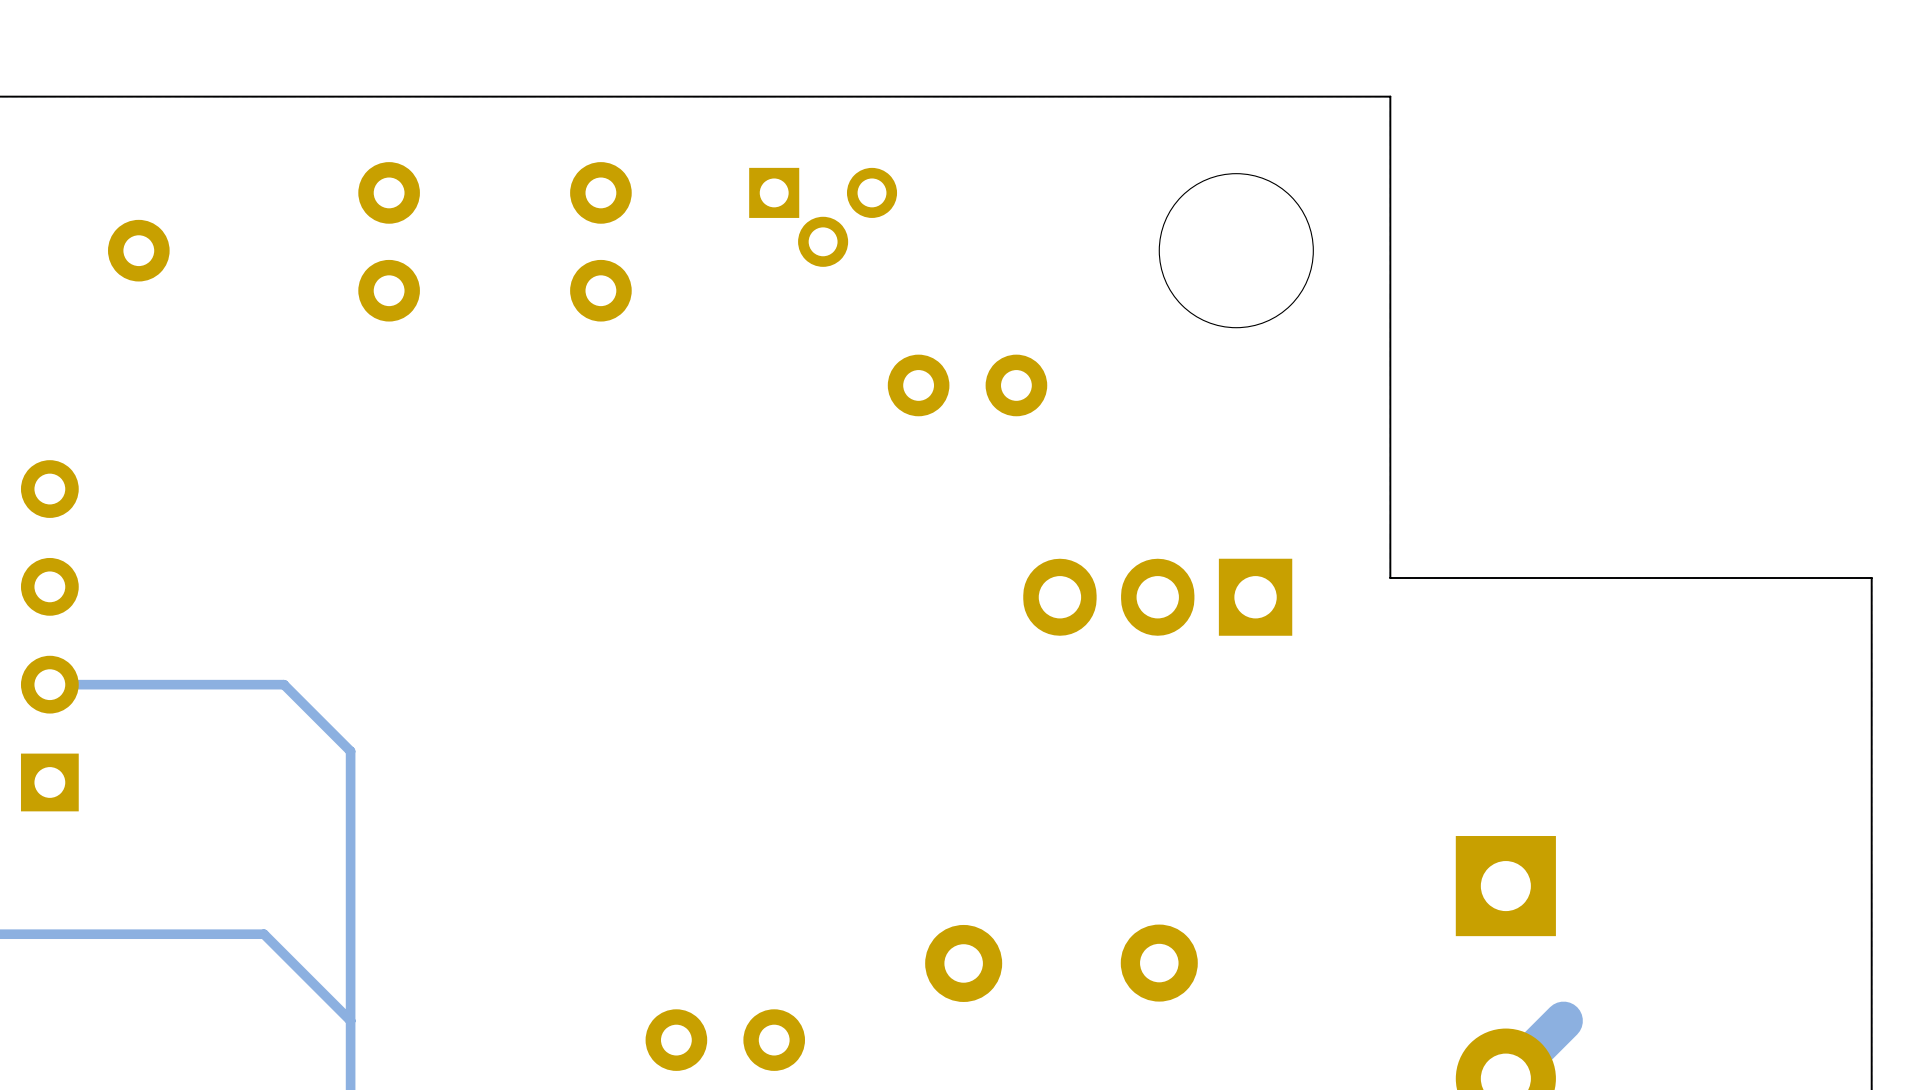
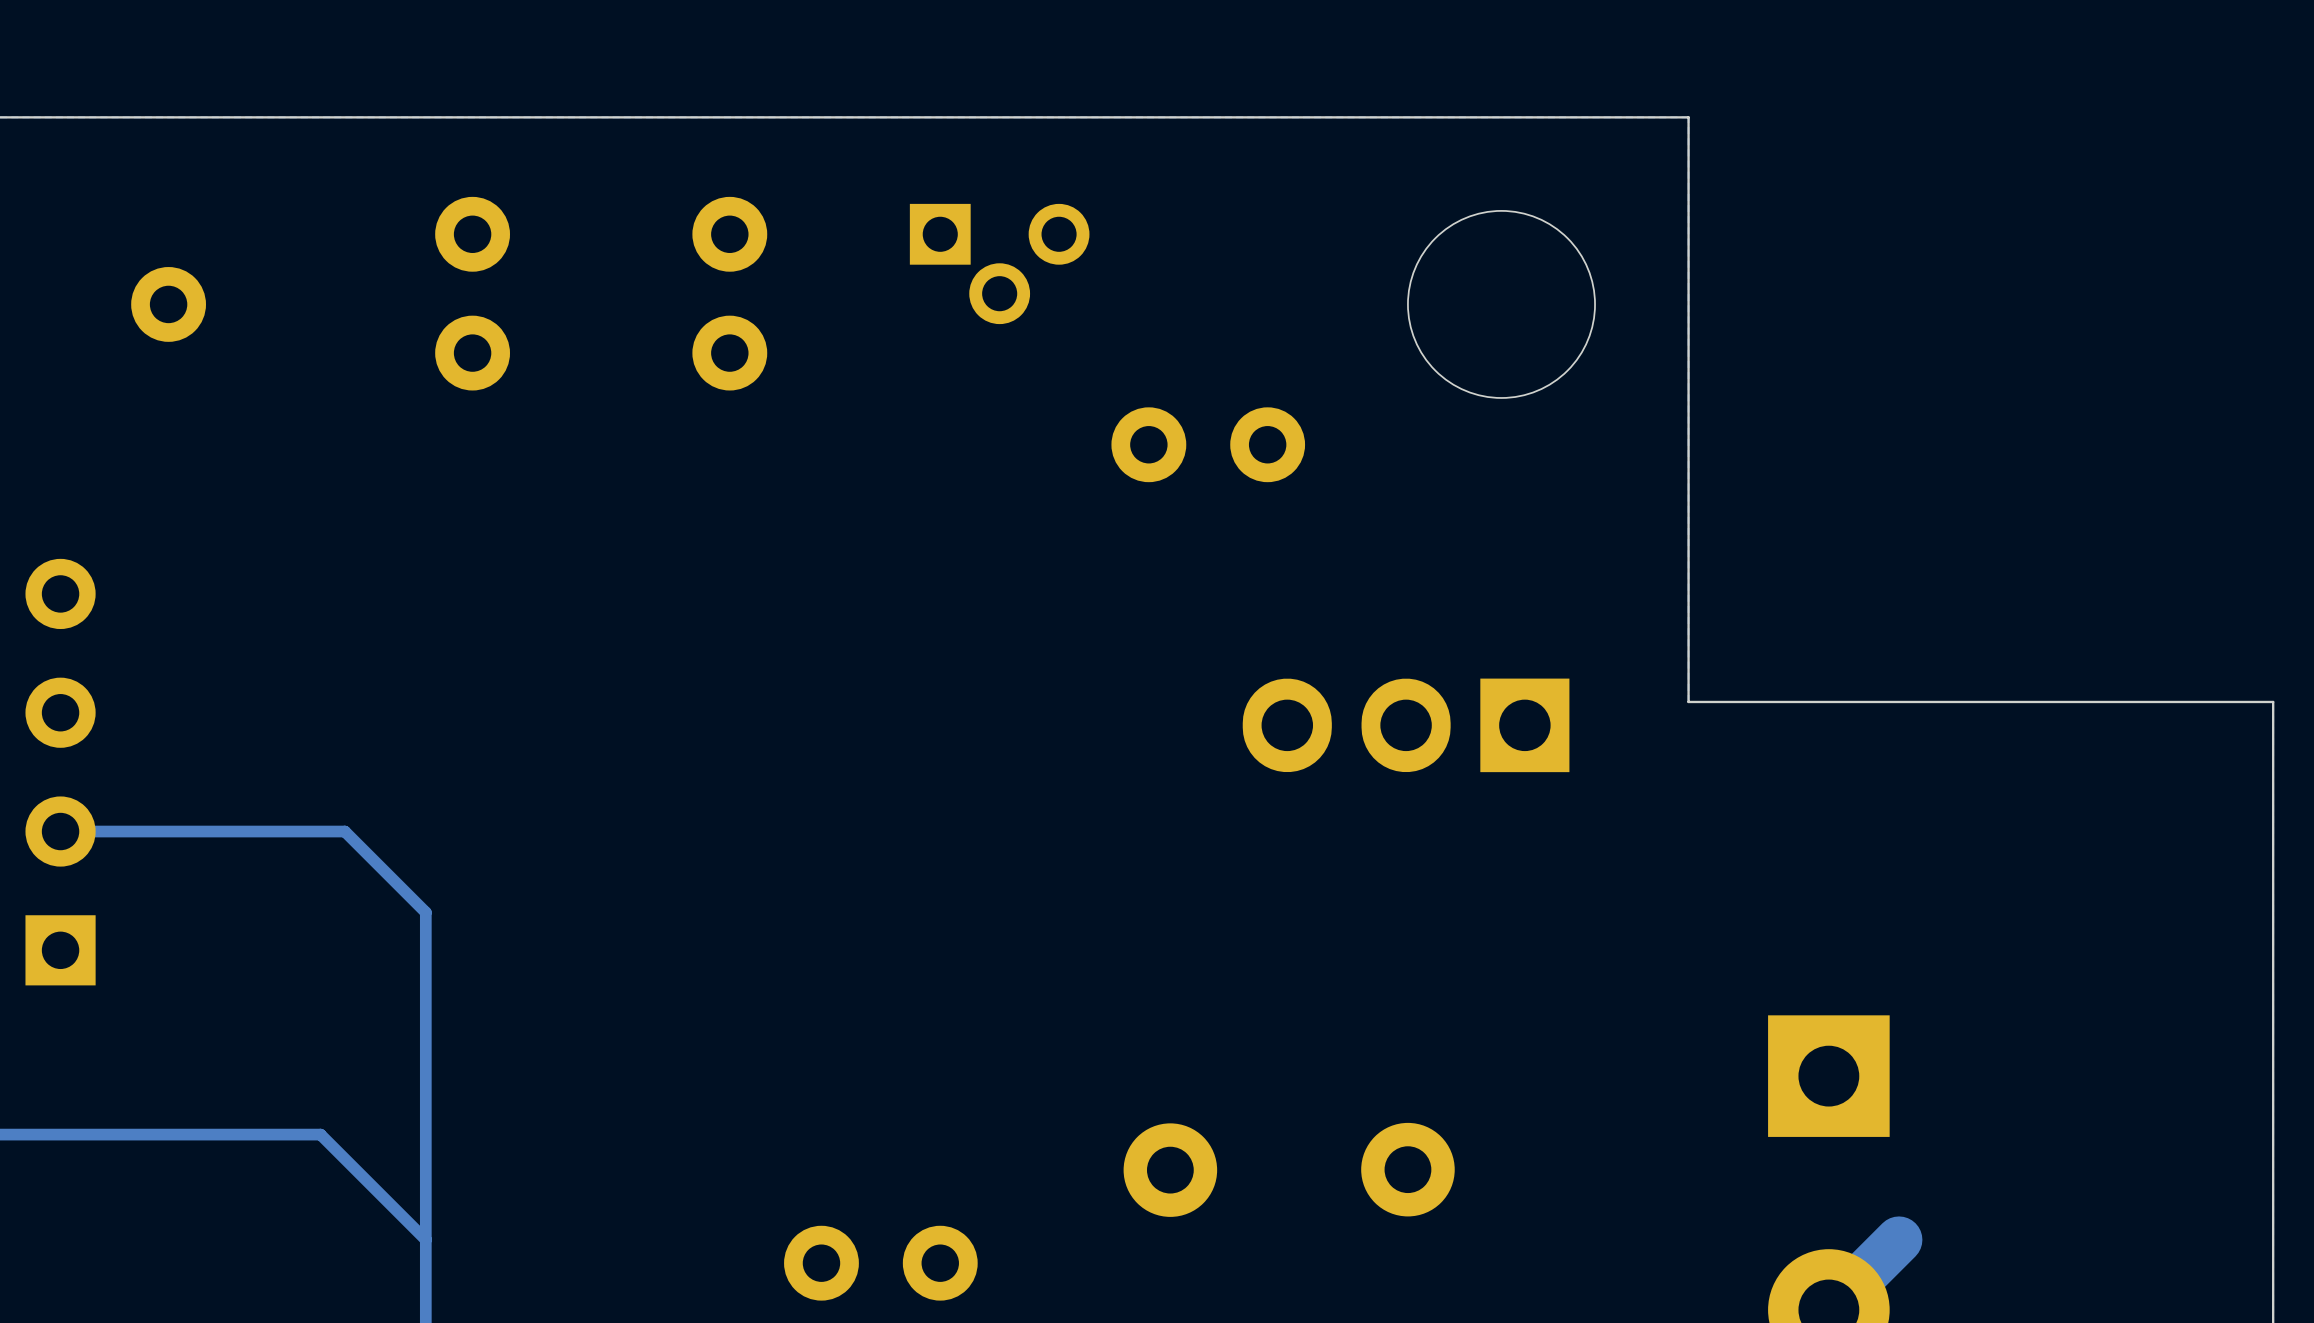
part position: (967, 385) -> (1208, 444)

